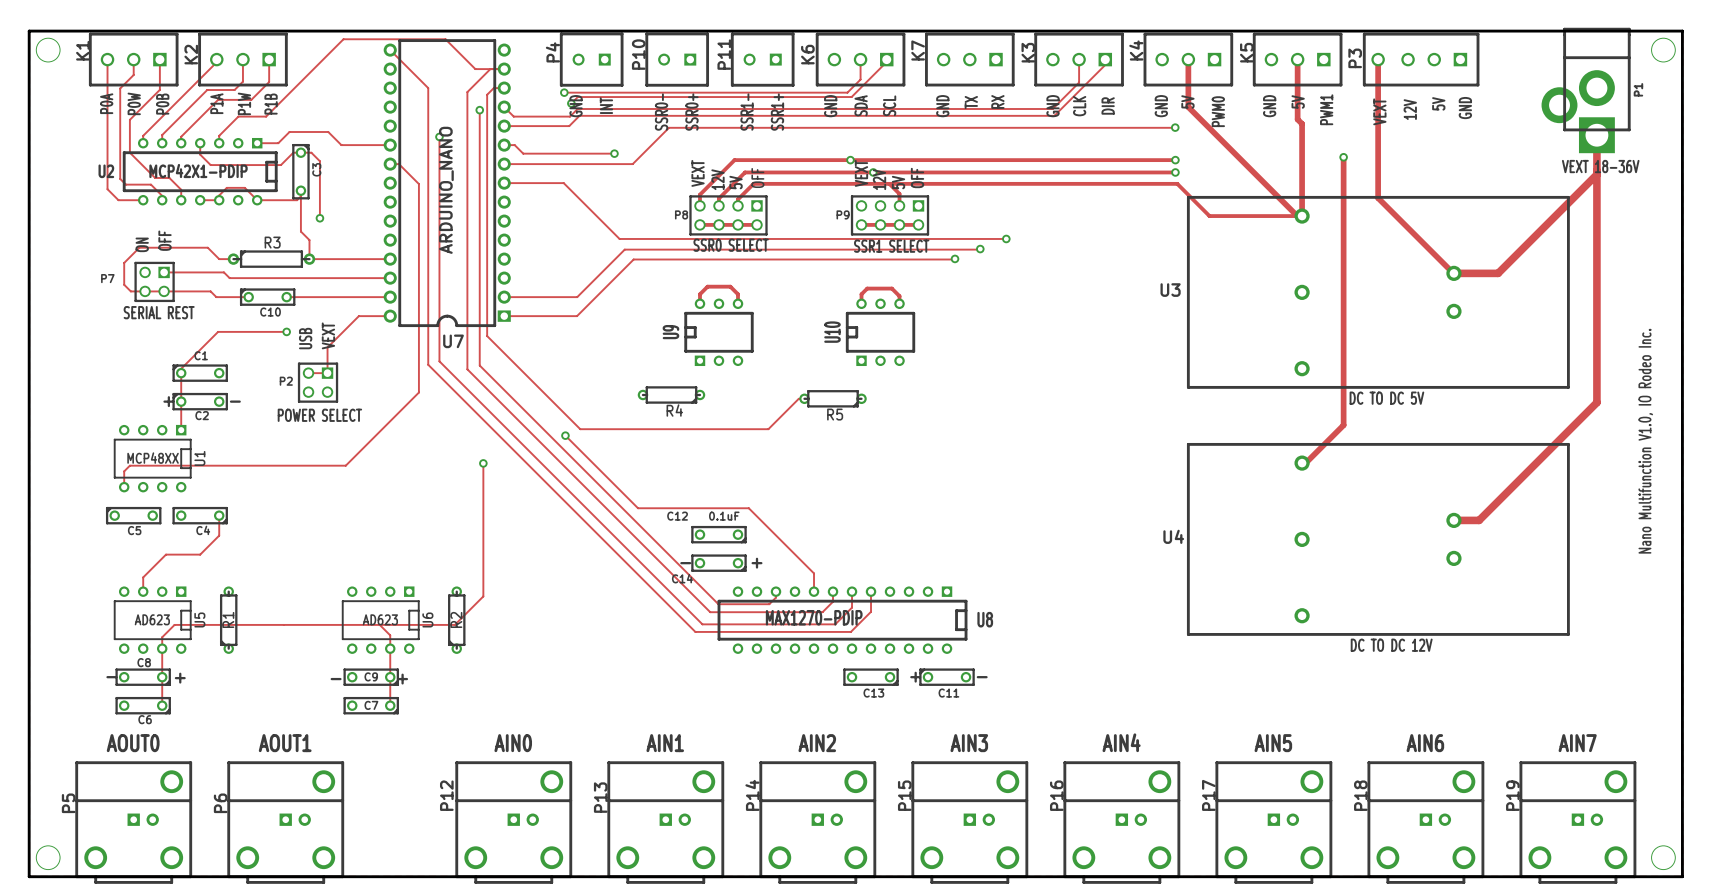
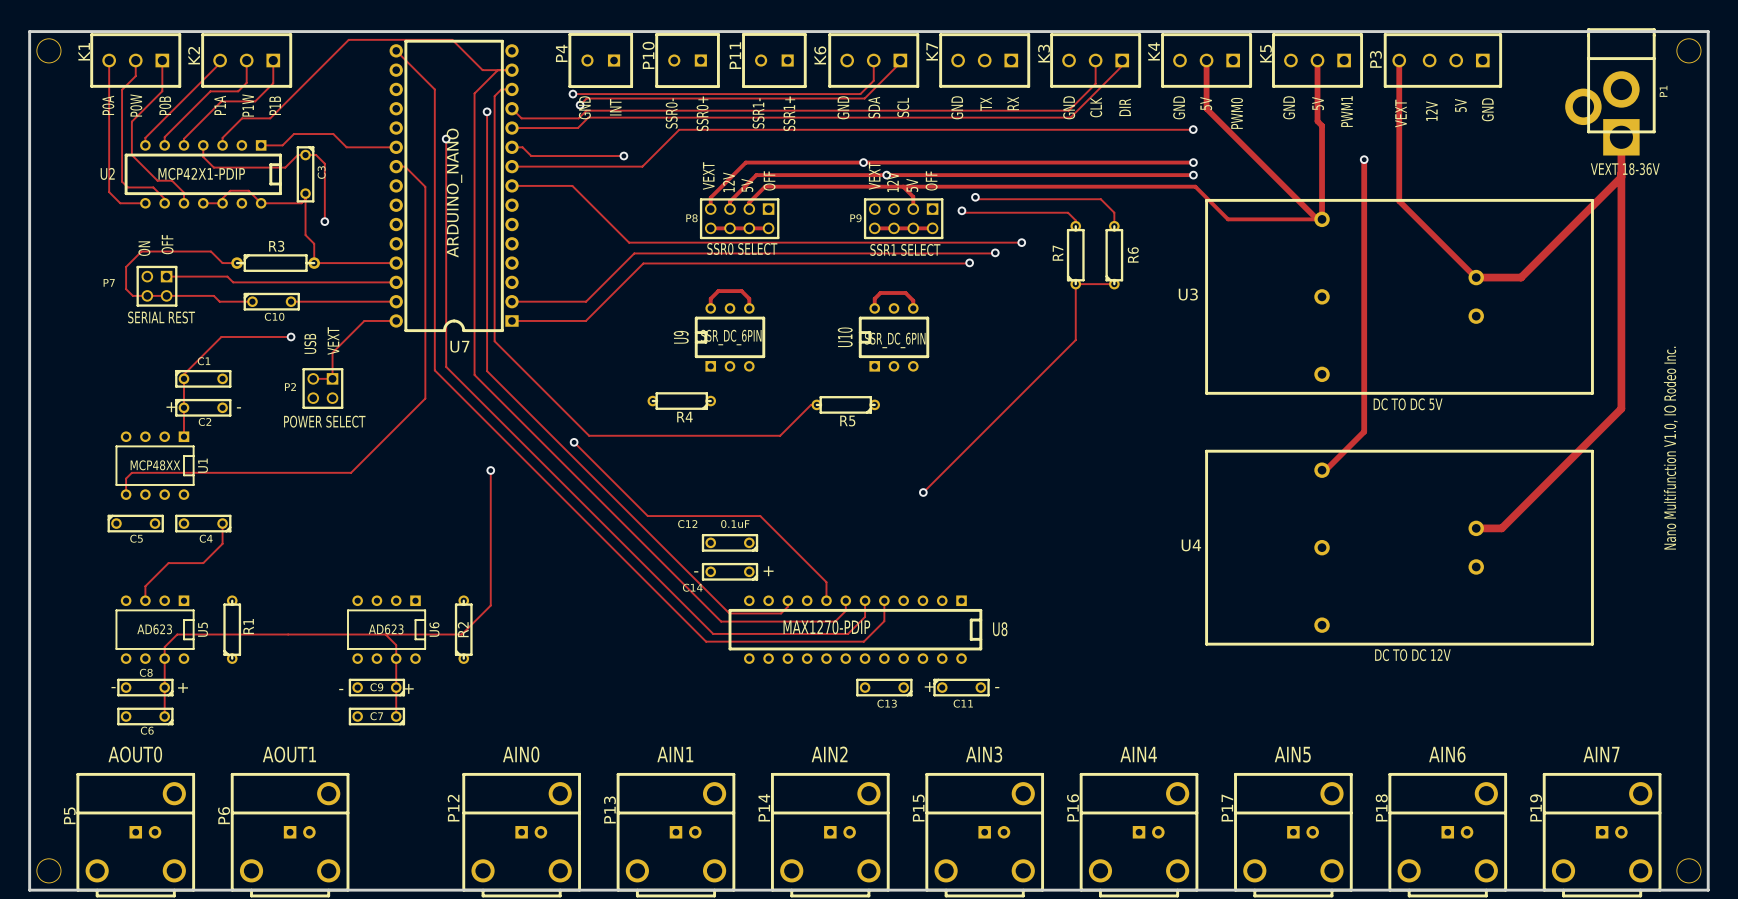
track: none -> (975, 197) (977, 199) (1100, 199) (1114, 212) (1114, 226)
via: none -> (975, 197)
track: none -> (961, 210) (963, 212) (1068, 212) (1075, 220) (1075, 226)
via: none -> (961, 210)
R7: none -> (1075, 255)
R6: none -> (1114, 255)
track: none -> (1114, 284) (1075, 284) (1075, 340) (923, 492)
U9 value: none -> SSR_DC_6PIN (731, 337)
U10 value: none -> SSR_DC_6PIN (895, 340)
via: none -> (923, 492)
R1 name position: R1 (228, 619) -> R1 (248, 626)

